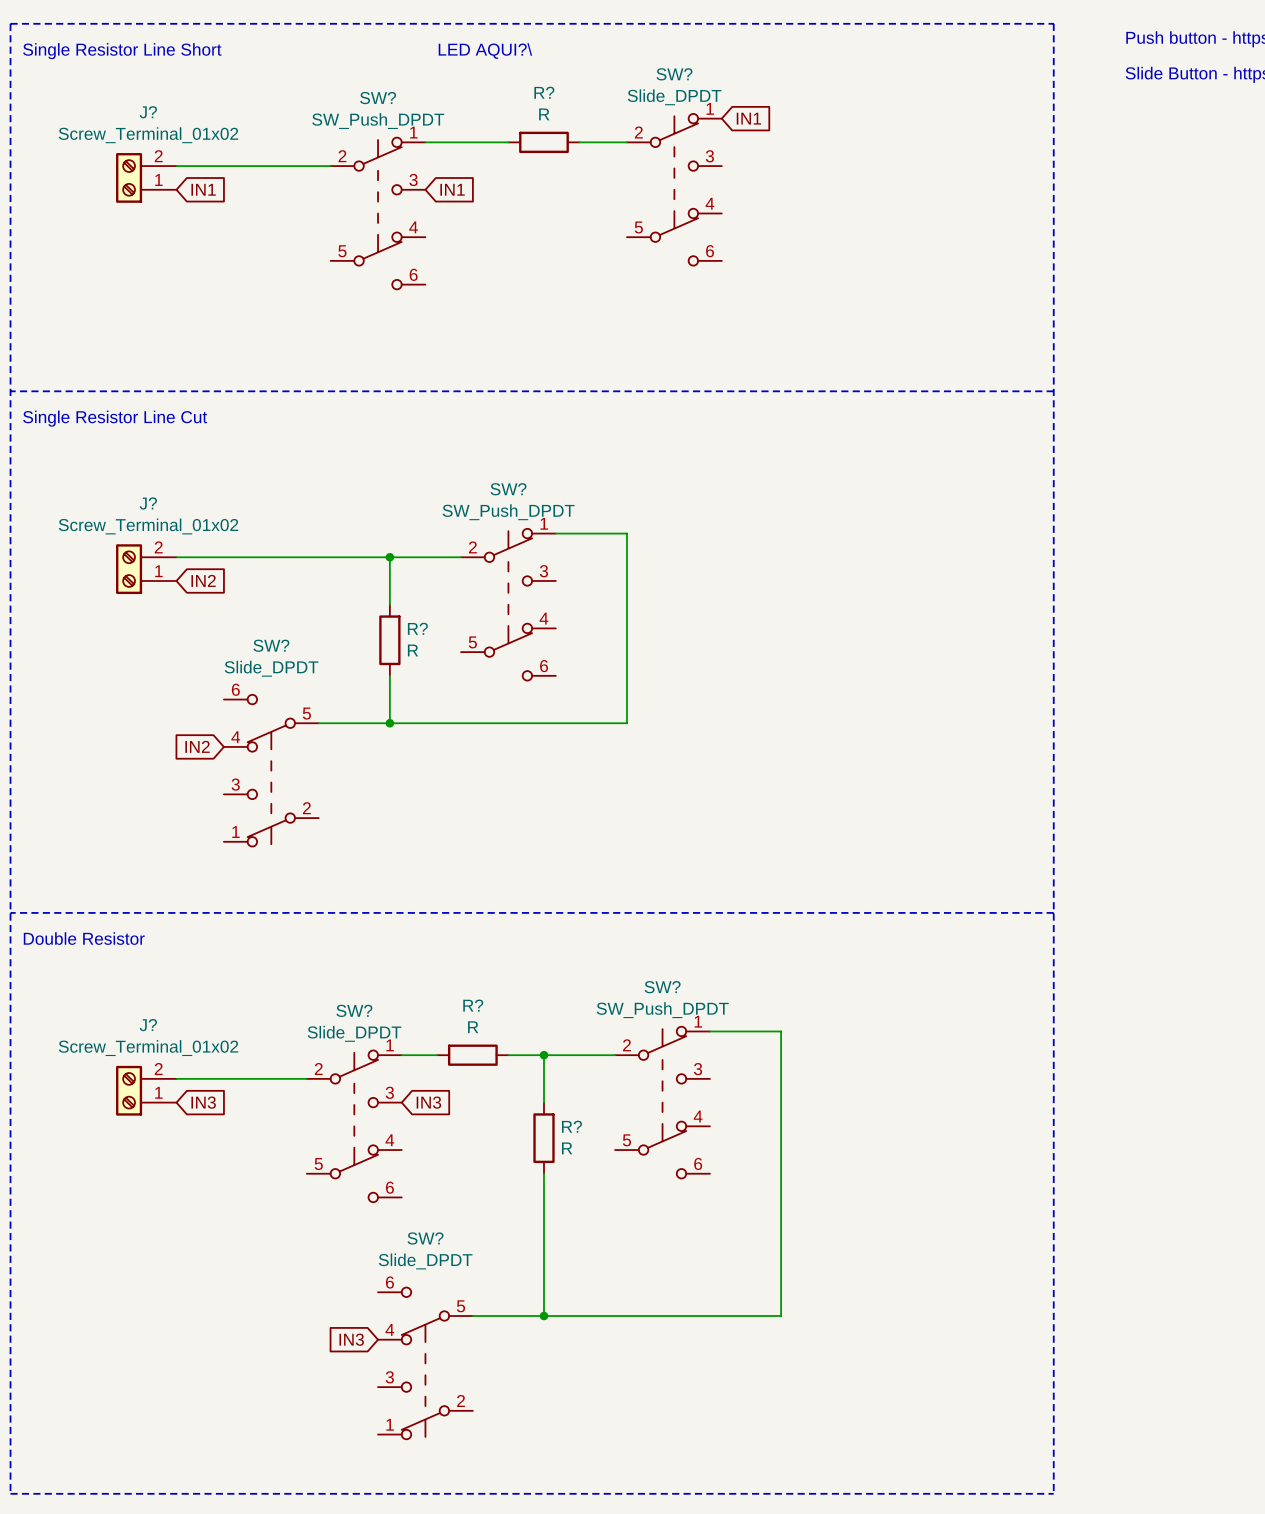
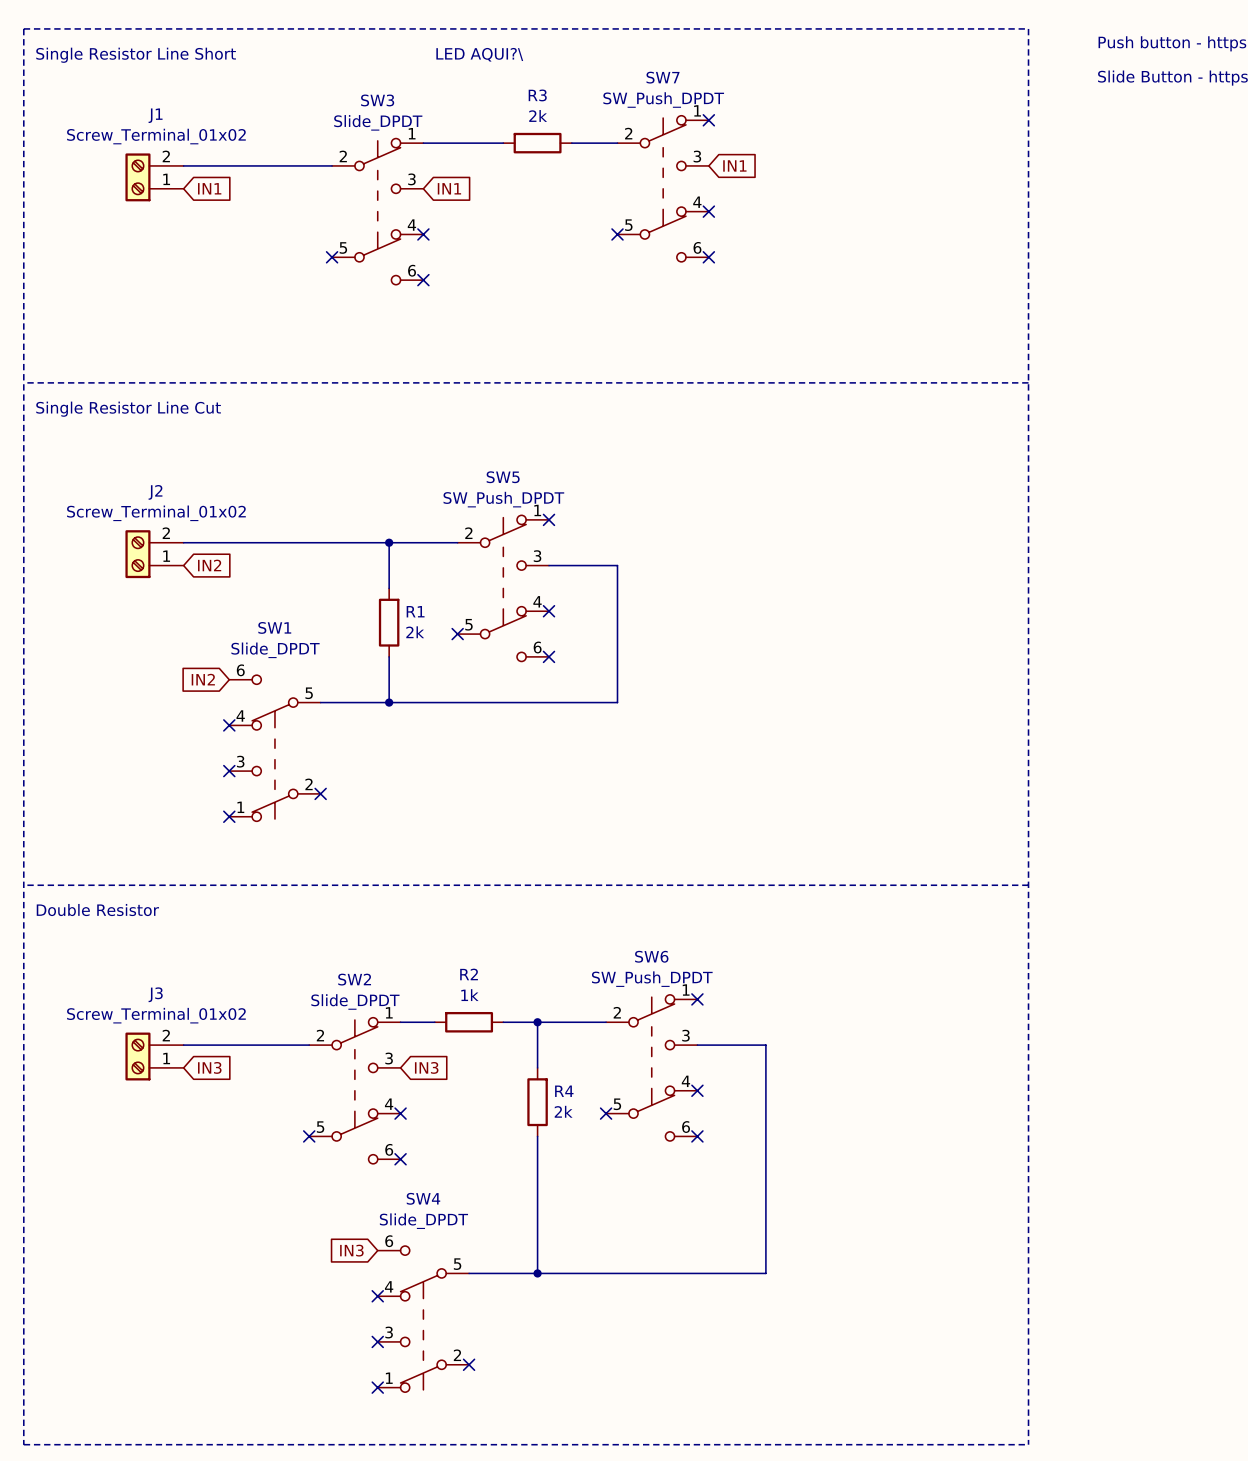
SW? name: SW? (674, 74) -> SW7 (663, 77)
R? name: R? (544, 92) -> R3 (537, 95)
SW? value: Slide_DPDT (674, 97) -> SW_Push_DPDT (663, 100)
SW? name: SW? (378, 98) -> SW3 (377, 100)
J? name: J? (148, 112) -> J1 (155, 115)
R? value: R (544, 114) -> 2k (538, 115)
no-connect mark: none -> (708, 120)
global label position: IN1 (748, 118) -> IN1 (734, 165)
SW? value: SW_Push_DPDT (378, 121) -> Slide_DPDT (378, 122)
no-connect mark: none -> (708, 211)
no-connect mark: none -> (423, 234)
no-connect mark: none -> (617, 234)
no-connect mark: none -> (332, 257)
no-connect mark: none -> (708, 257)
no-connect mark: none -> (423, 280)
SW? name: SW? (508, 489) -> SW5 (503, 477)
J? name: J? (148, 503) -> J2 (155, 492)
wire: (555, 533) (626, 533) (626, 580) -> (548, 565) (617, 565)
no-connect mark: none -> (548, 519)
R? name: R? (417, 628) -> R1 (415, 611)
no-connect mark: none -> (548, 611)
SW? name: SW? (271, 645) -> SW1 (274, 627)
R? value: R (413, 650) -> 2k (415, 632)
no-connect mark: none -> (457, 634)
no-connect mark: none -> (548, 656)
global label position: IN2 (197, 746) -> IN2 (203, 679)
no-connect mark: none -> (229, 725)
no-connect mark: none -> (229, 771)
no-connect mark: none -> (320, 793)
no-connect mark: none -> (229, 816)
SW? name: SW? (662, 987) -> SW6 (651, 956)
R? name: R? (473, 1005) -> R2 (469, 974)
SW? name: SW? (354, 1010) -> SW2 (354, 979)
J? name: J? (148, 1025) -> J3 (155, 994)
R? value: R (473, 1027) -> 1k (469, 995)
wire: (709, 1031) (781, 1031) (781, 1078) -> (697, 1045) (765, 1045)
no-connect mark: none -> (697, 999)
R? name: R? (571, 1126) -> R4 (564, 1091)
no-connect mark: none -> (697, 1090)
R? value: R (567, 1148) -> 2k (563, 1111)
no-connect mark: none -> (400, 1113)
no-connect mark: none -> (606, 1113)
no-connect mark: none -> (309, 1136)
no-connect mark: none -> (697, 1136)
no-connect mark: none -> (400, 1159)
SW? name: SW? (425, 1238) -> SW4 (423, 1198)
global label position: IN3 (351, 1339) -> IN3 (351, 1250)
no-connect mark: none -> (377, 1296)
no-connect mark: none -> (377, 1341)
no-connect mark: none -> (469, 1364)
no-connect mark: none -> (377, 1387)

